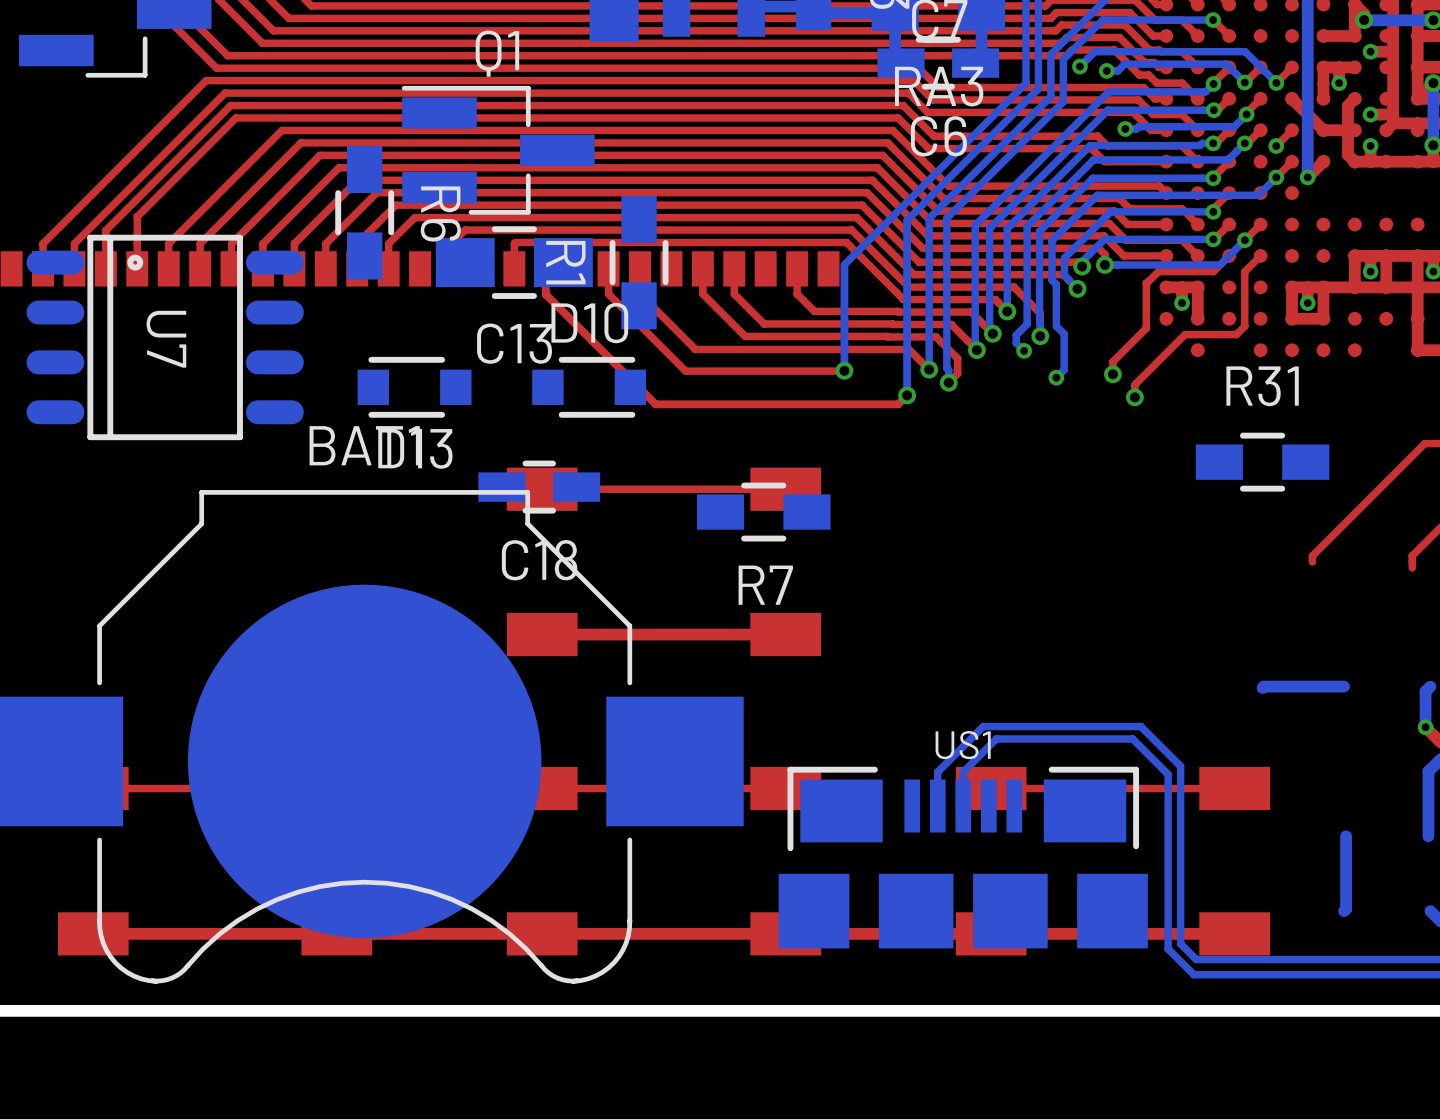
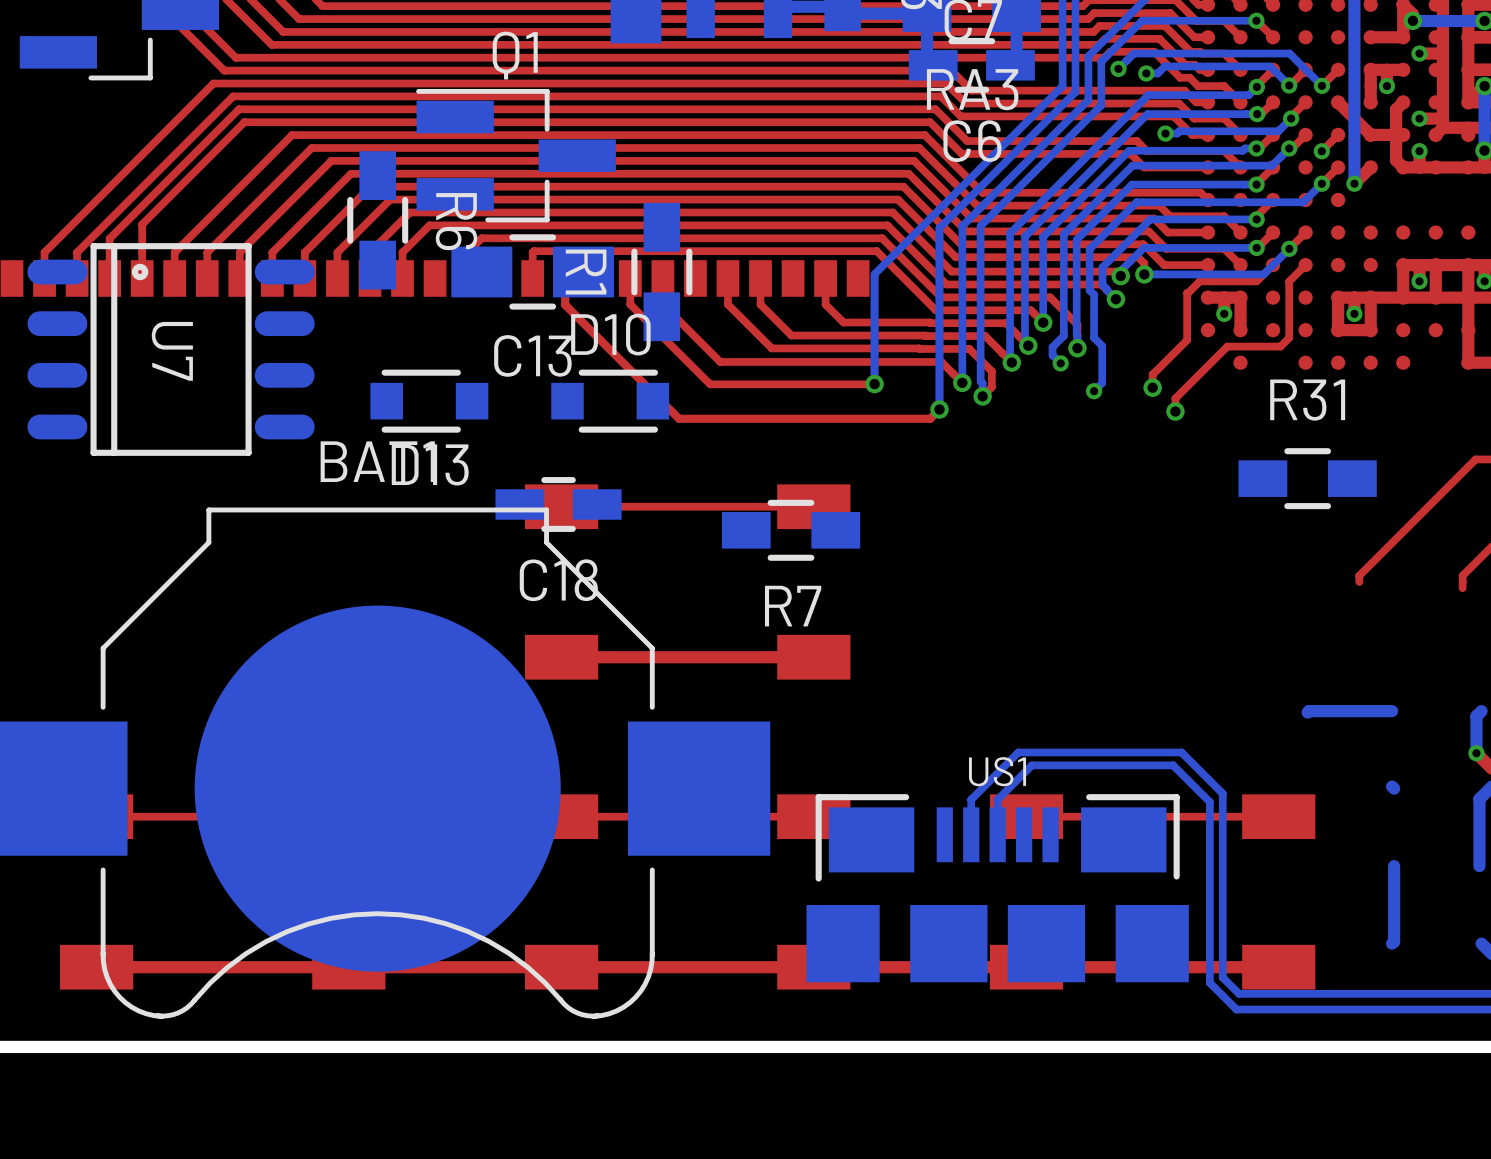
bottom track: none -> (1392, 786) (1394, 788)

